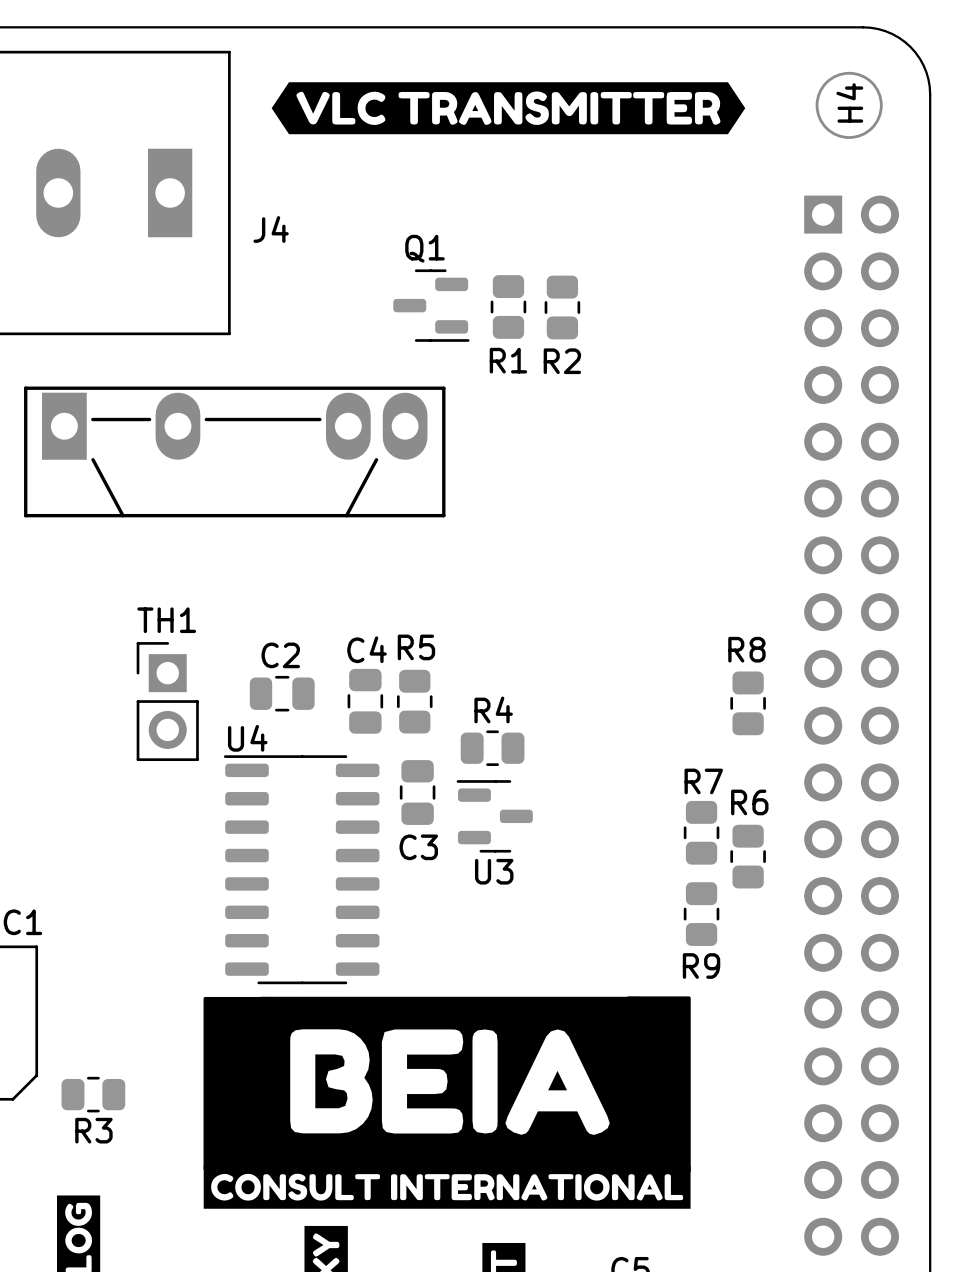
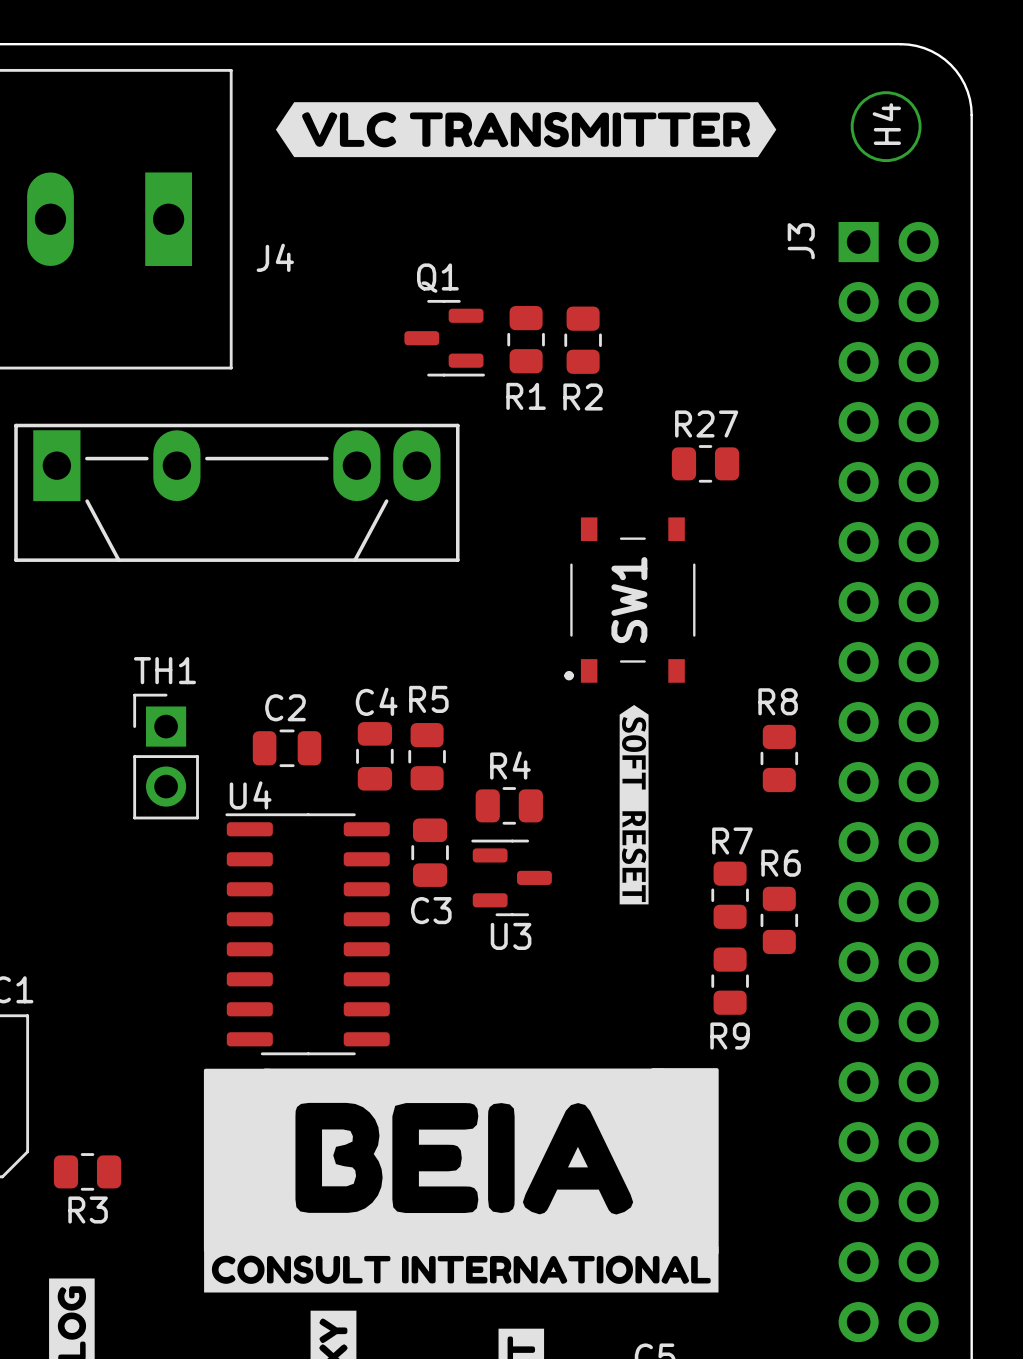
J3 name: none -> J3 (801, 241)
R27: none -> (705, 463)
SW1: none -> (629, 600)
drawing: none -> [619, 704, 649, 905]

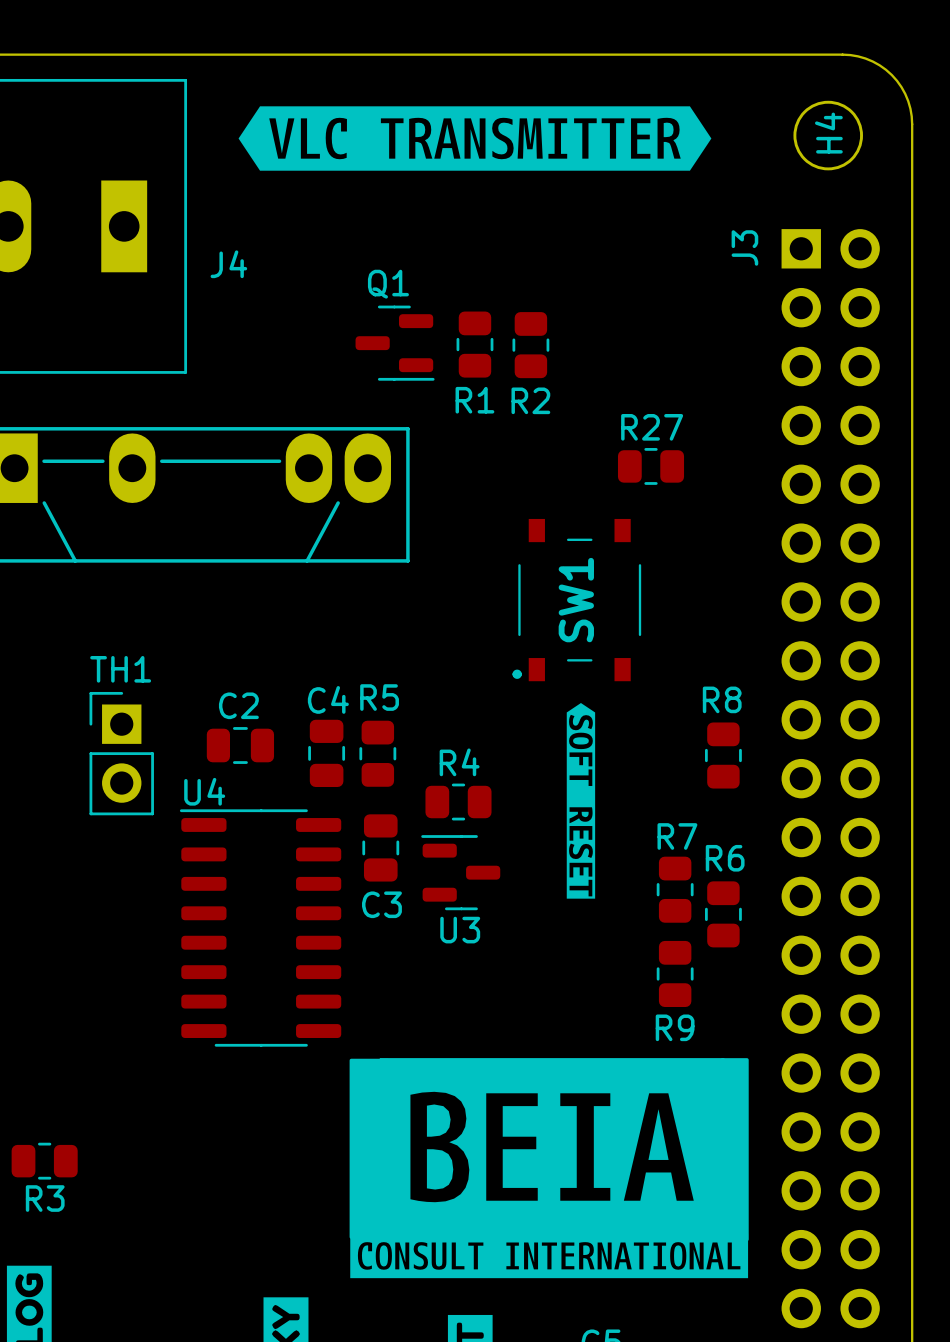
drawing shape: [275, 102, 777, 158] -> [238, 106, 712, 171]
drawing: none -> [349, 1058, 749, 1279]
drawing: [203, 1068, 719, 1293] -> none

